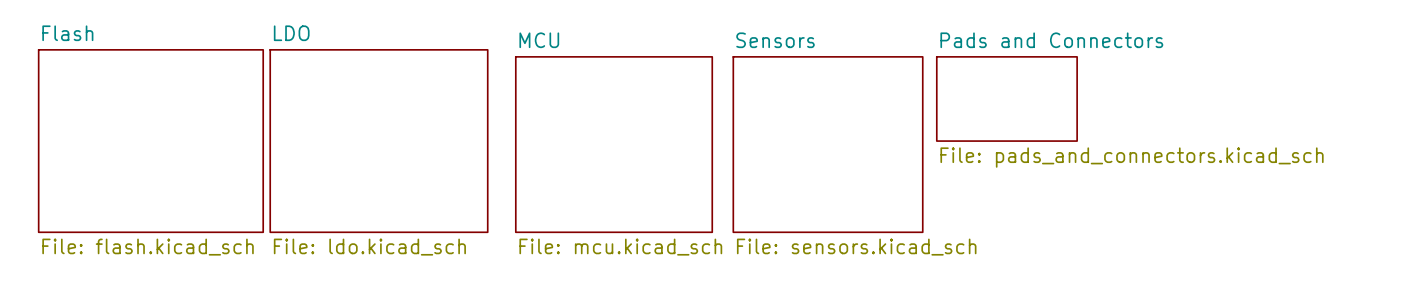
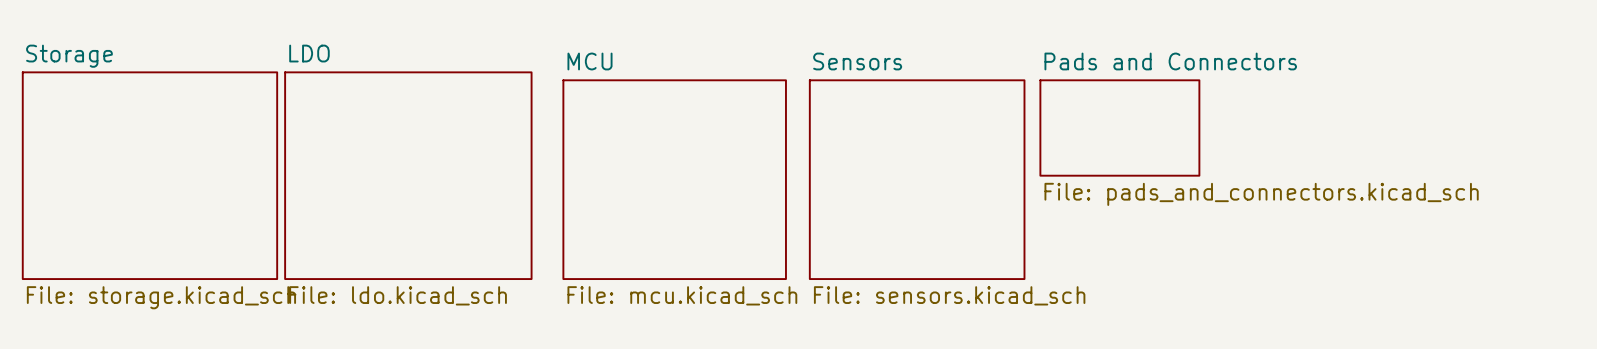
sheet Flash name: Flash (67, 33) -> Storage (69, 56)
sheet Flash value: File: flash.kicad_sch (148, 247) -> File: storage.kicad_sch (161, 297)

